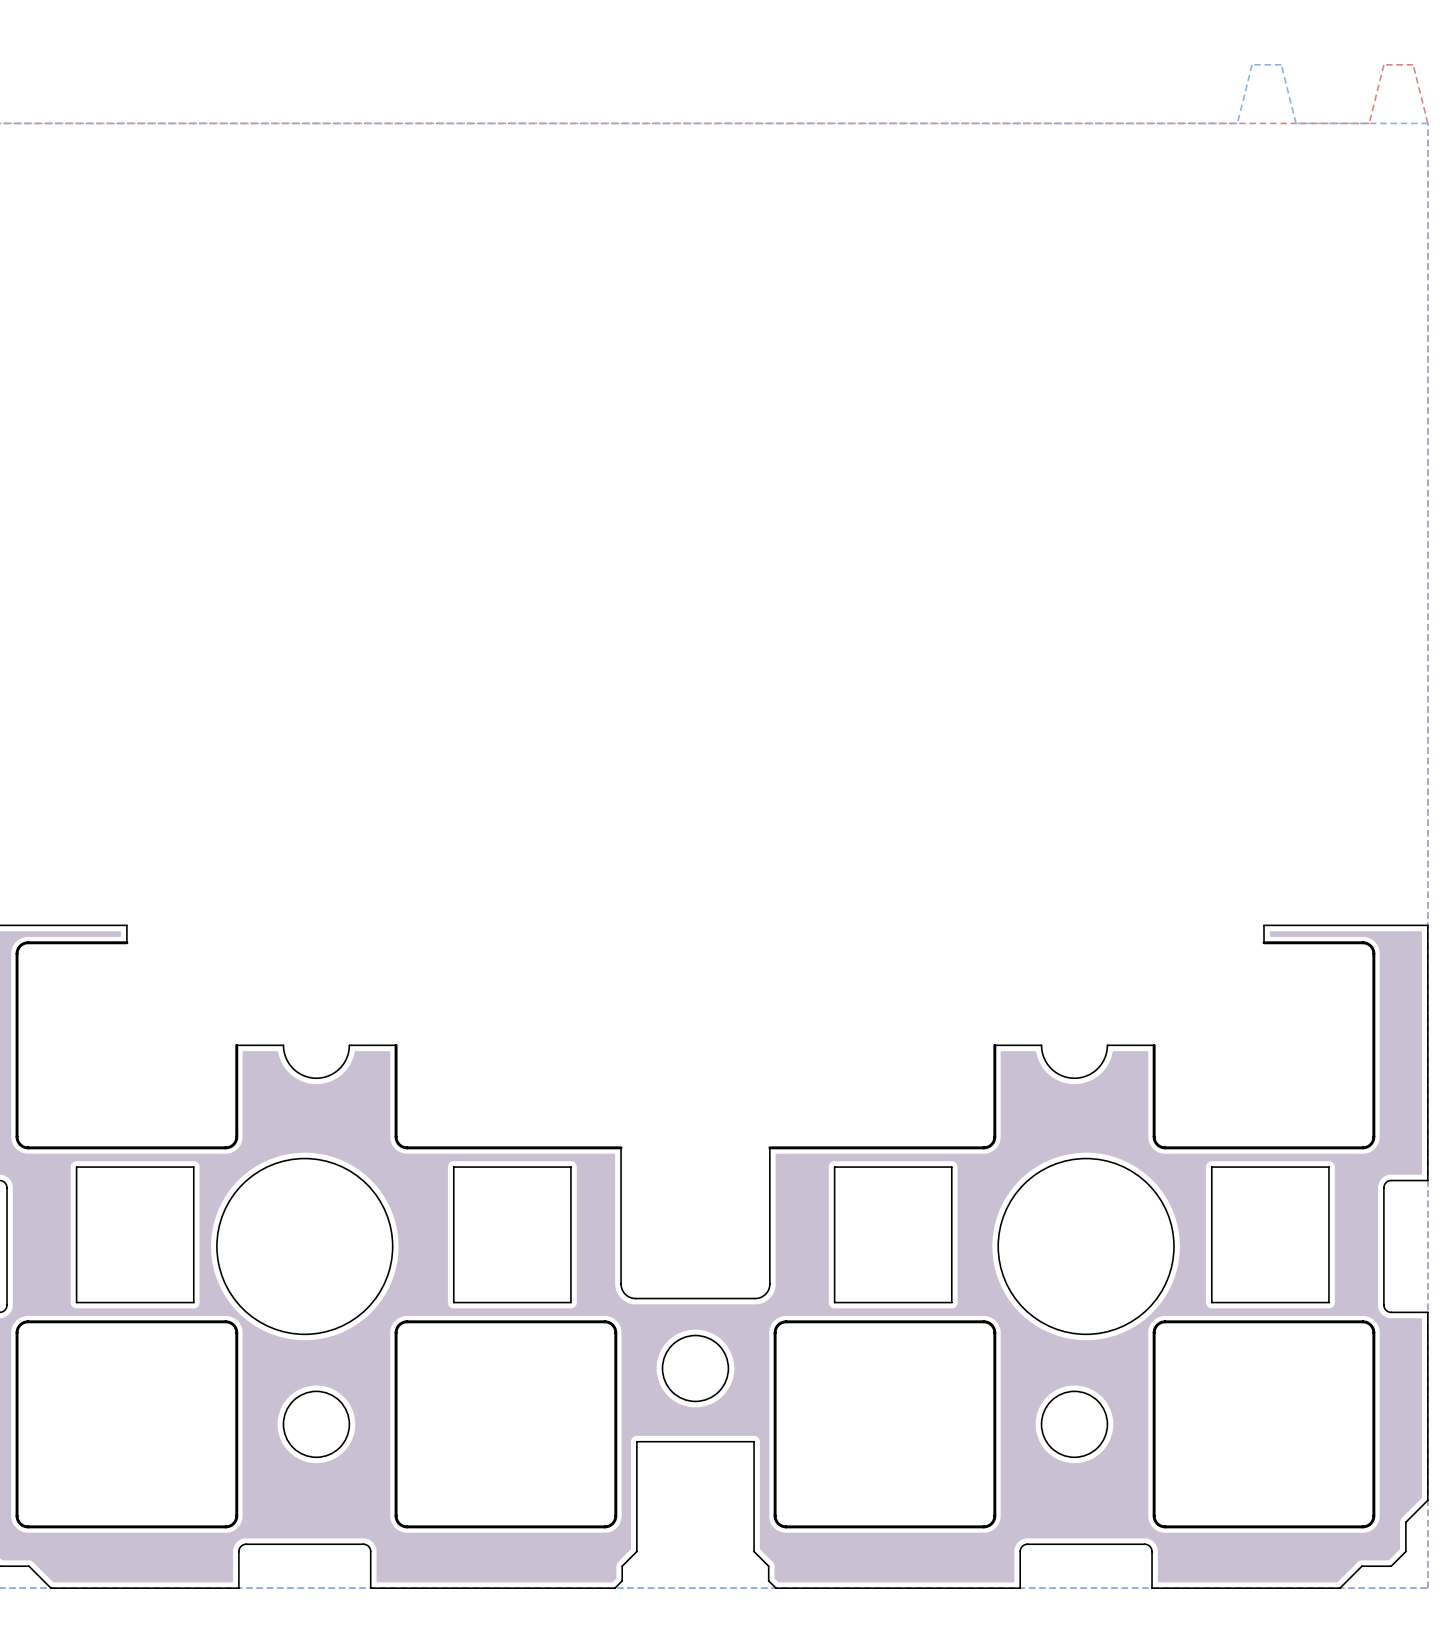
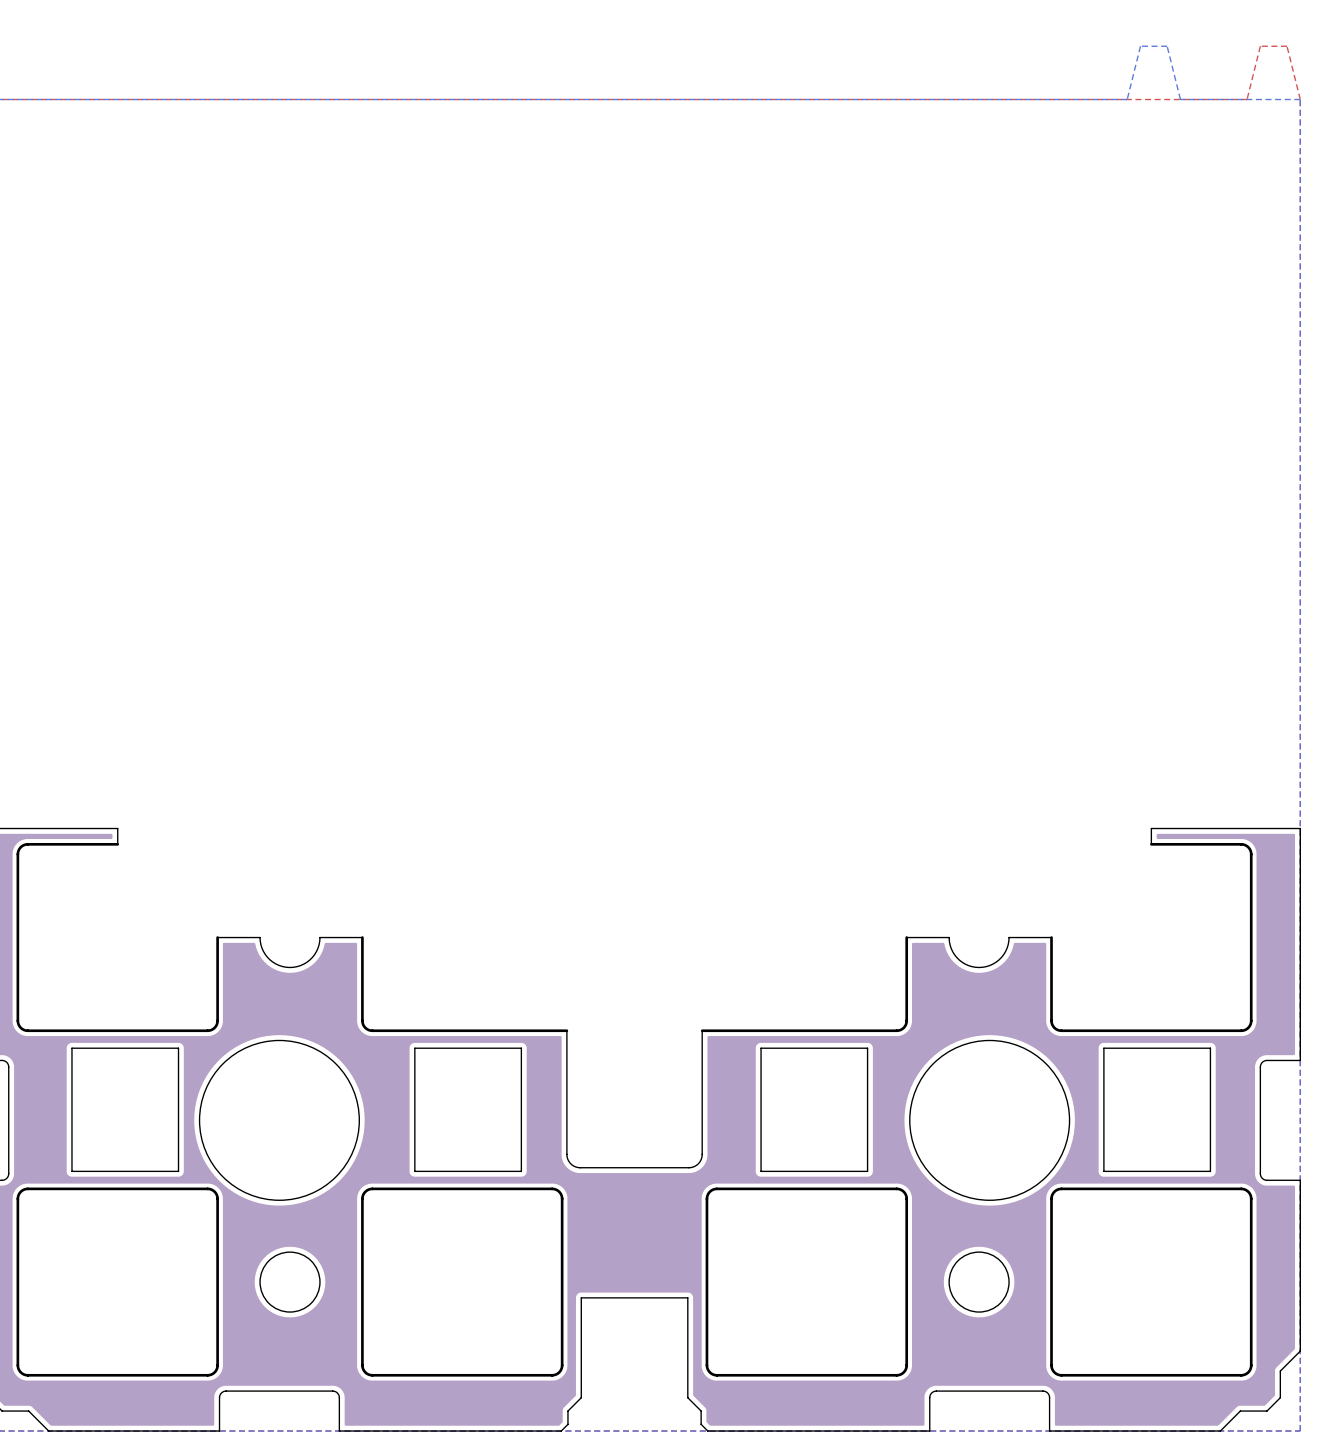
round board edge: [662, 1335, 729, 1402] -> none

